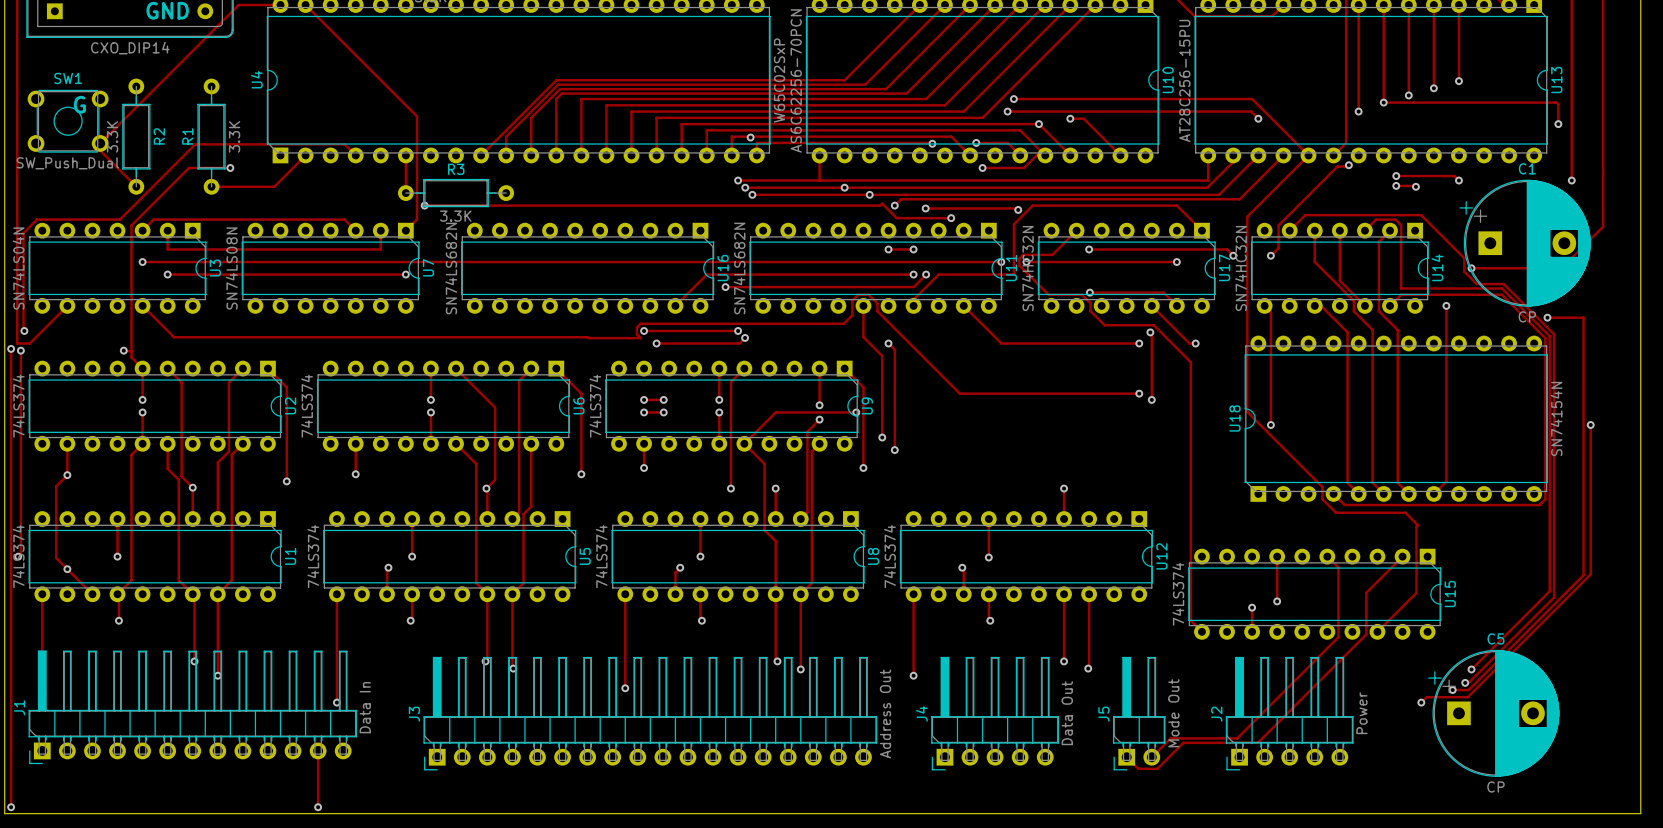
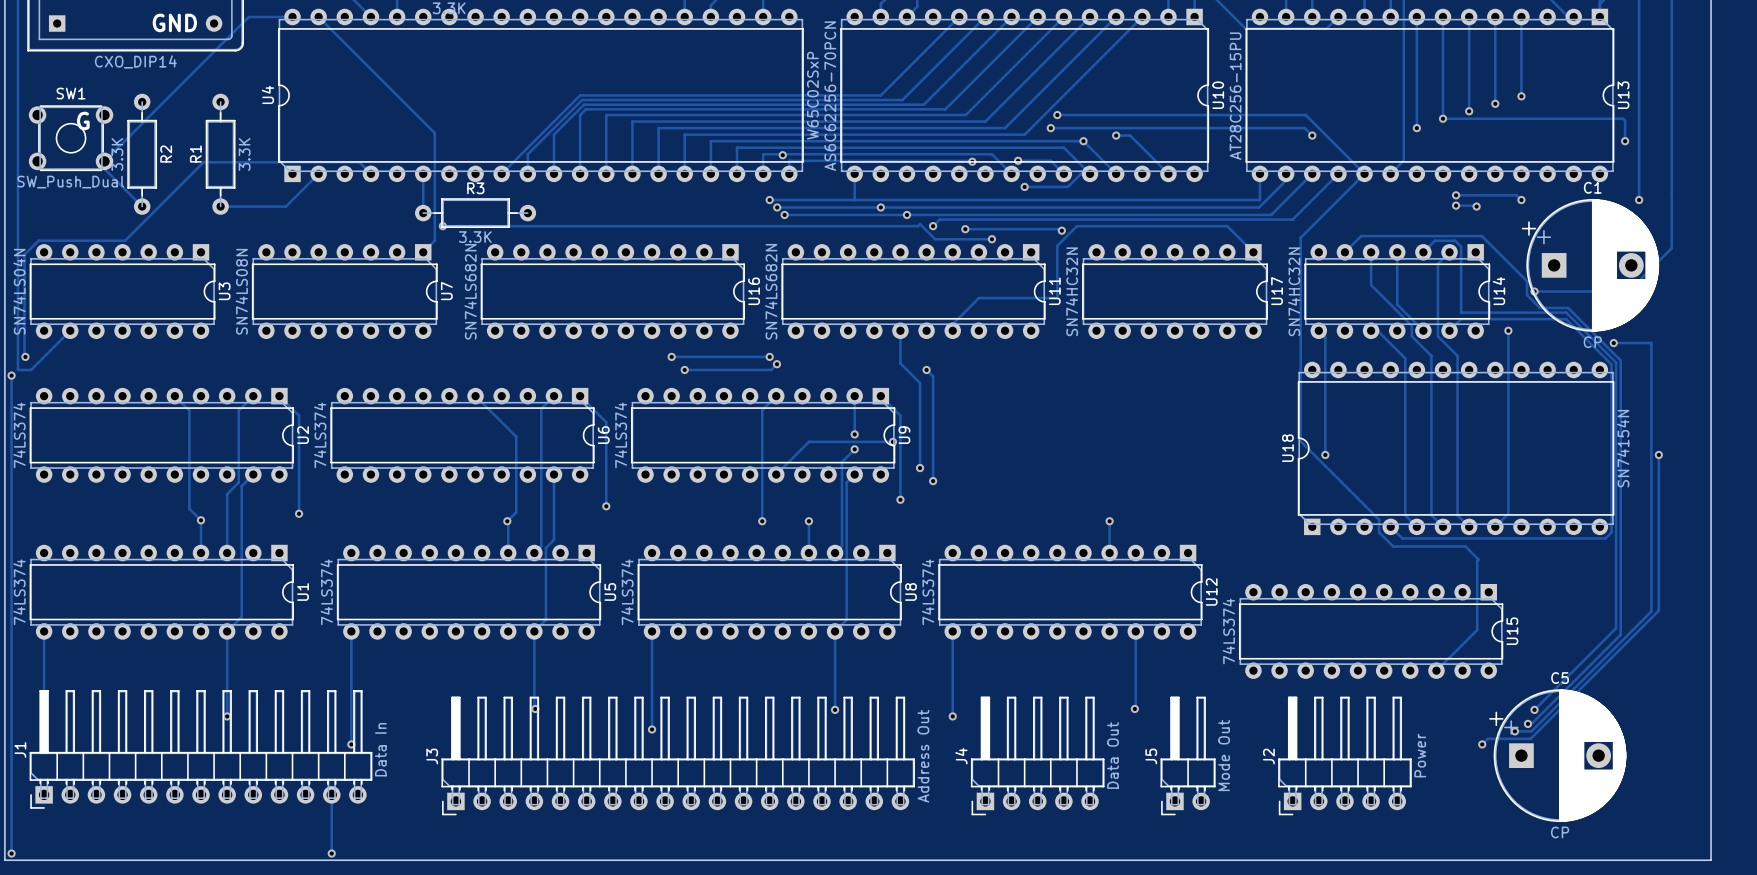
track: (1348, 165) (1337, 166) (1278, 225) (1278, 248) (1270, 255) -> none
via: (1348, 165) -> none
track: (230, 167) (188, 167) (131, 225) (131, 357) (142, 368) (142, 399) -> none
via: (230, 167) -> none
track: (142, 230) (153, 219) (344, 219) (355, 230) -> none
track: (167, 230) (167, 249) (380, 249) (380, 230) -> none
track: (1076, 230) (1052, 254) (1023, 254) (1019, 258) (1019, 265) (1048, 294) (1081, 294) (1090, 303) (1090, 311) (1104, 325) (1153, 325) (1190, 362) (1190, 620) (1201, 631) -> none
track: (888, 249) (913, 249) -> none
via: (888, 249) -> none
via: (913, 249) -> none
track: (1089, 249) (1227, 249) (1233, 255) -> none
via: (1089, 249) -> none
via: (1233, 255) -> none
via: (1270, 255) -> none
track: (142, 262) (1001, 262) -> none
via: (142, 262) -> none
via: (1001, 262) -> none
track: (1026, 262) (1176, 262) -> none
via: (1026, 262) -> none
via: (1176, 262) -> none
track: (167, 274) (405, 274) -> none
via: (167, 274) -> none
via: (405, 274) -> none
track: (913, 274) (706, 274) (675, 305) -> none
via: (913, 274) -> none
track: (926, 274) (913, 287) (725, 287) -> none
via: (926, 274) -> none
via: (725, 287) -> none
track: (1089, 292) (1163, 292) (1176, 305) -> none
via: (1089, 292) -> none
track: (142, 305) (173, 337) (640, 338) (636, 334) (636, 327) (640, 323) (843, 323) (852, 315) (852, 300) (858, 294) (868, 294) (877, 303) (877, 311) (959, 393) (1139, 393) -> none
track: (963, 305) (1001, 343) (1139, 343) -> none
track: (1151, 305) (1189, 343) (1195, 343) -> none
track: (1150, 332) (1151, 399) -> none
via: (1150, 332) -> none
via: (1139, 343) -> none
via: (1195, 343) -> none
track: (20, 350) (20, 554) (18, 556) -> none
via: (20, 350) -> none
track: (123, 350) (131, 351) -> none
via: (123, 350) -> none
track: (430, 368) (430, 399) -> none
track: (719, 368) (719, 399) -> none
via: (1139, 393) -> none
via: (142, 399) -> none
via: (430, 399) -> none
track: (644, 399) (663, 399) -> none
via: (644, 399) -> none
via: (663, 399) -> none
via: (719, 399) -> none
via: (1151, 399) -> none
track: (142, 412) (142, 443) (131, 454) (131, 580) (117, 594) (118, 620) -> none
via: (142, 412) -> none
track: (430, 412) (430, 443) -> none
via: (430, 412) -> none
track: (644, 412) (663, 412) -> none
via: (644, 412) -> none
via: (663, 412) -> none
track: (719, 412) (719, 443) -> none
via: (719, 412) -> none
track: (67, 443) (67, 475) (56, 486) (56, 558) (92, 594) -> none
track: (167, 443) (167, 468) (178, 479) (178, 580) (194, 596) (194, 661) -> none
track: (355, 443) (355, 474) -> none
track: (456, 443) (476, 464) (476, 583) (487, 594) (487, 659) (485, 661) -> none
track: (644, 443) (644, 467) -> none
track: (744, 443) (764, 464) (764, 530) (775, 541) (775, 659) (777, 661) -> none
via: (644, 467) -> none
via: (355, 474) -> none
via: (67, 475) -> none
track: (117, 519) (117, 556) -> none
track: (412, 519) (412, 556) -> none
track: (700, 519) (700, 556) -> none
track: (988, 519) (988, 557) -> none
via: (18, 556) -> none
via: (117, 556) -> none
via: (412, 556) -> none
via: (700, 556) -> none
track: (1277, 556) (1277, 601) -> none
track: (1327, 556) (1338, 567) (1338, 637) (1237, 738) (1170, 738) (1151, 757) -> none
track: (1402, 556) (1366, 592) (1366, 634) (1257, 742) (1183, 742) (1157, 768) (1138, 768) (1126, 757) -> none
via: (988, 557) -> none
track: (388, 567) (387, 594) -> none
via: (388, 567) -> none
track: (680, 567) (675, 572) (675, 594) -> none
via: (680, 567) -> none
track: (962, 567) (963, 594) -> none
via: (962, 567) -> none
via: (67, 569) -> none
track: (412, 594) (410, 620) -> none
track: (700, 594) (701, 620) -> none
track: (988, 594) (990, 620) -> none
track: (1064, 594) (1064, 661) -> none
via: (1277, 601) -> none
track: (1252, 607) (1252, 631) -> none
via: (1252, 607) -> none
via: (118, 620) -> none
via: (410, 620) -> none
via: (701, 620) -> none
via: (990, 620) -> none
via: (194, 661) -> none
via: (485, 661) -> none
via: (777, 661) -> none
via: (1064, 661) -> none

